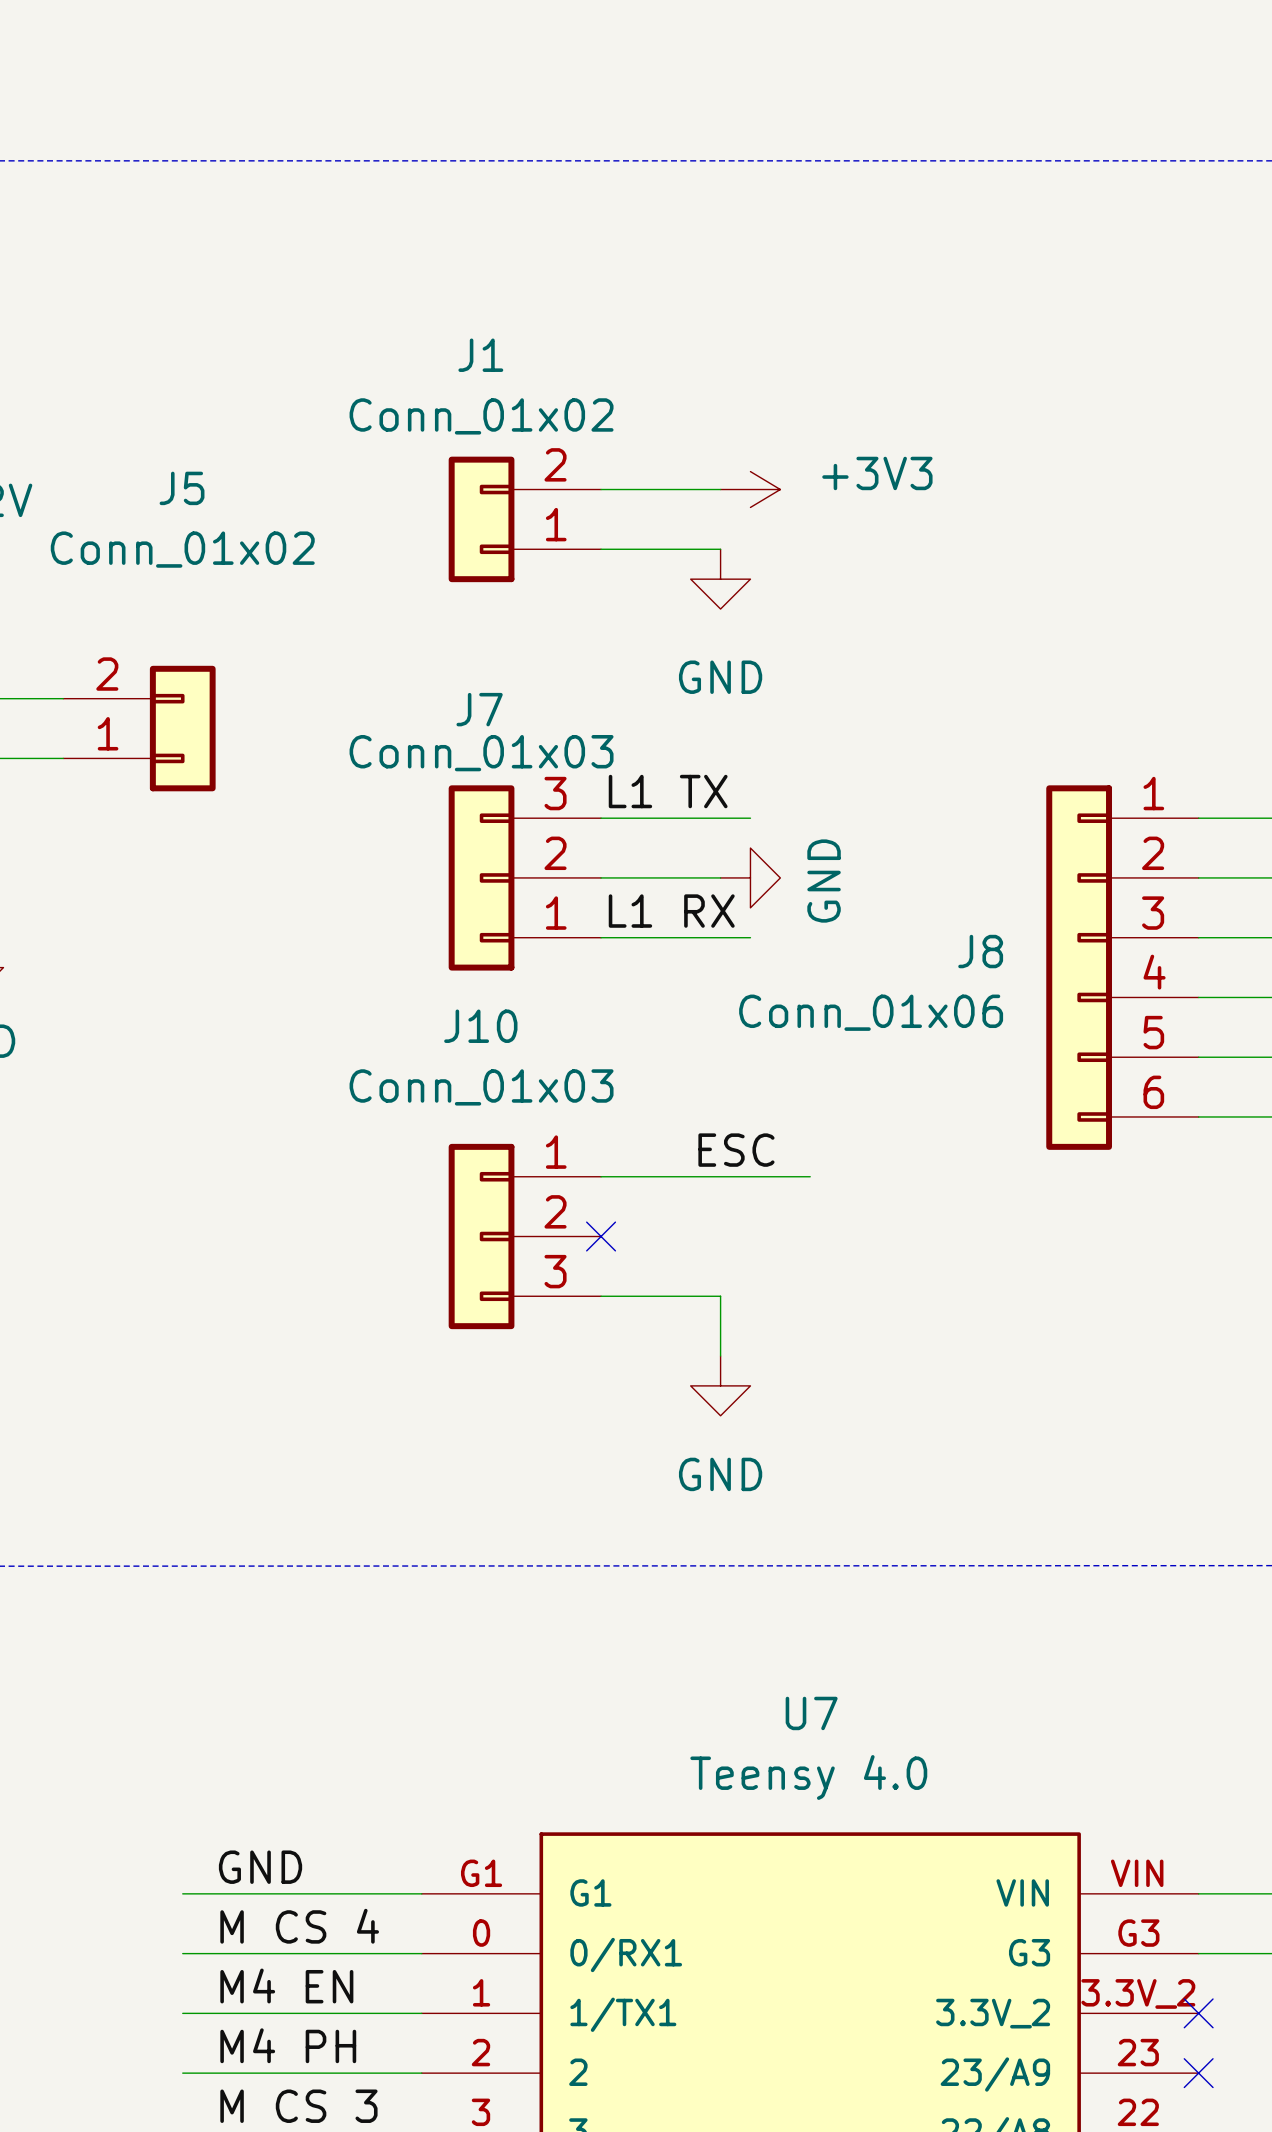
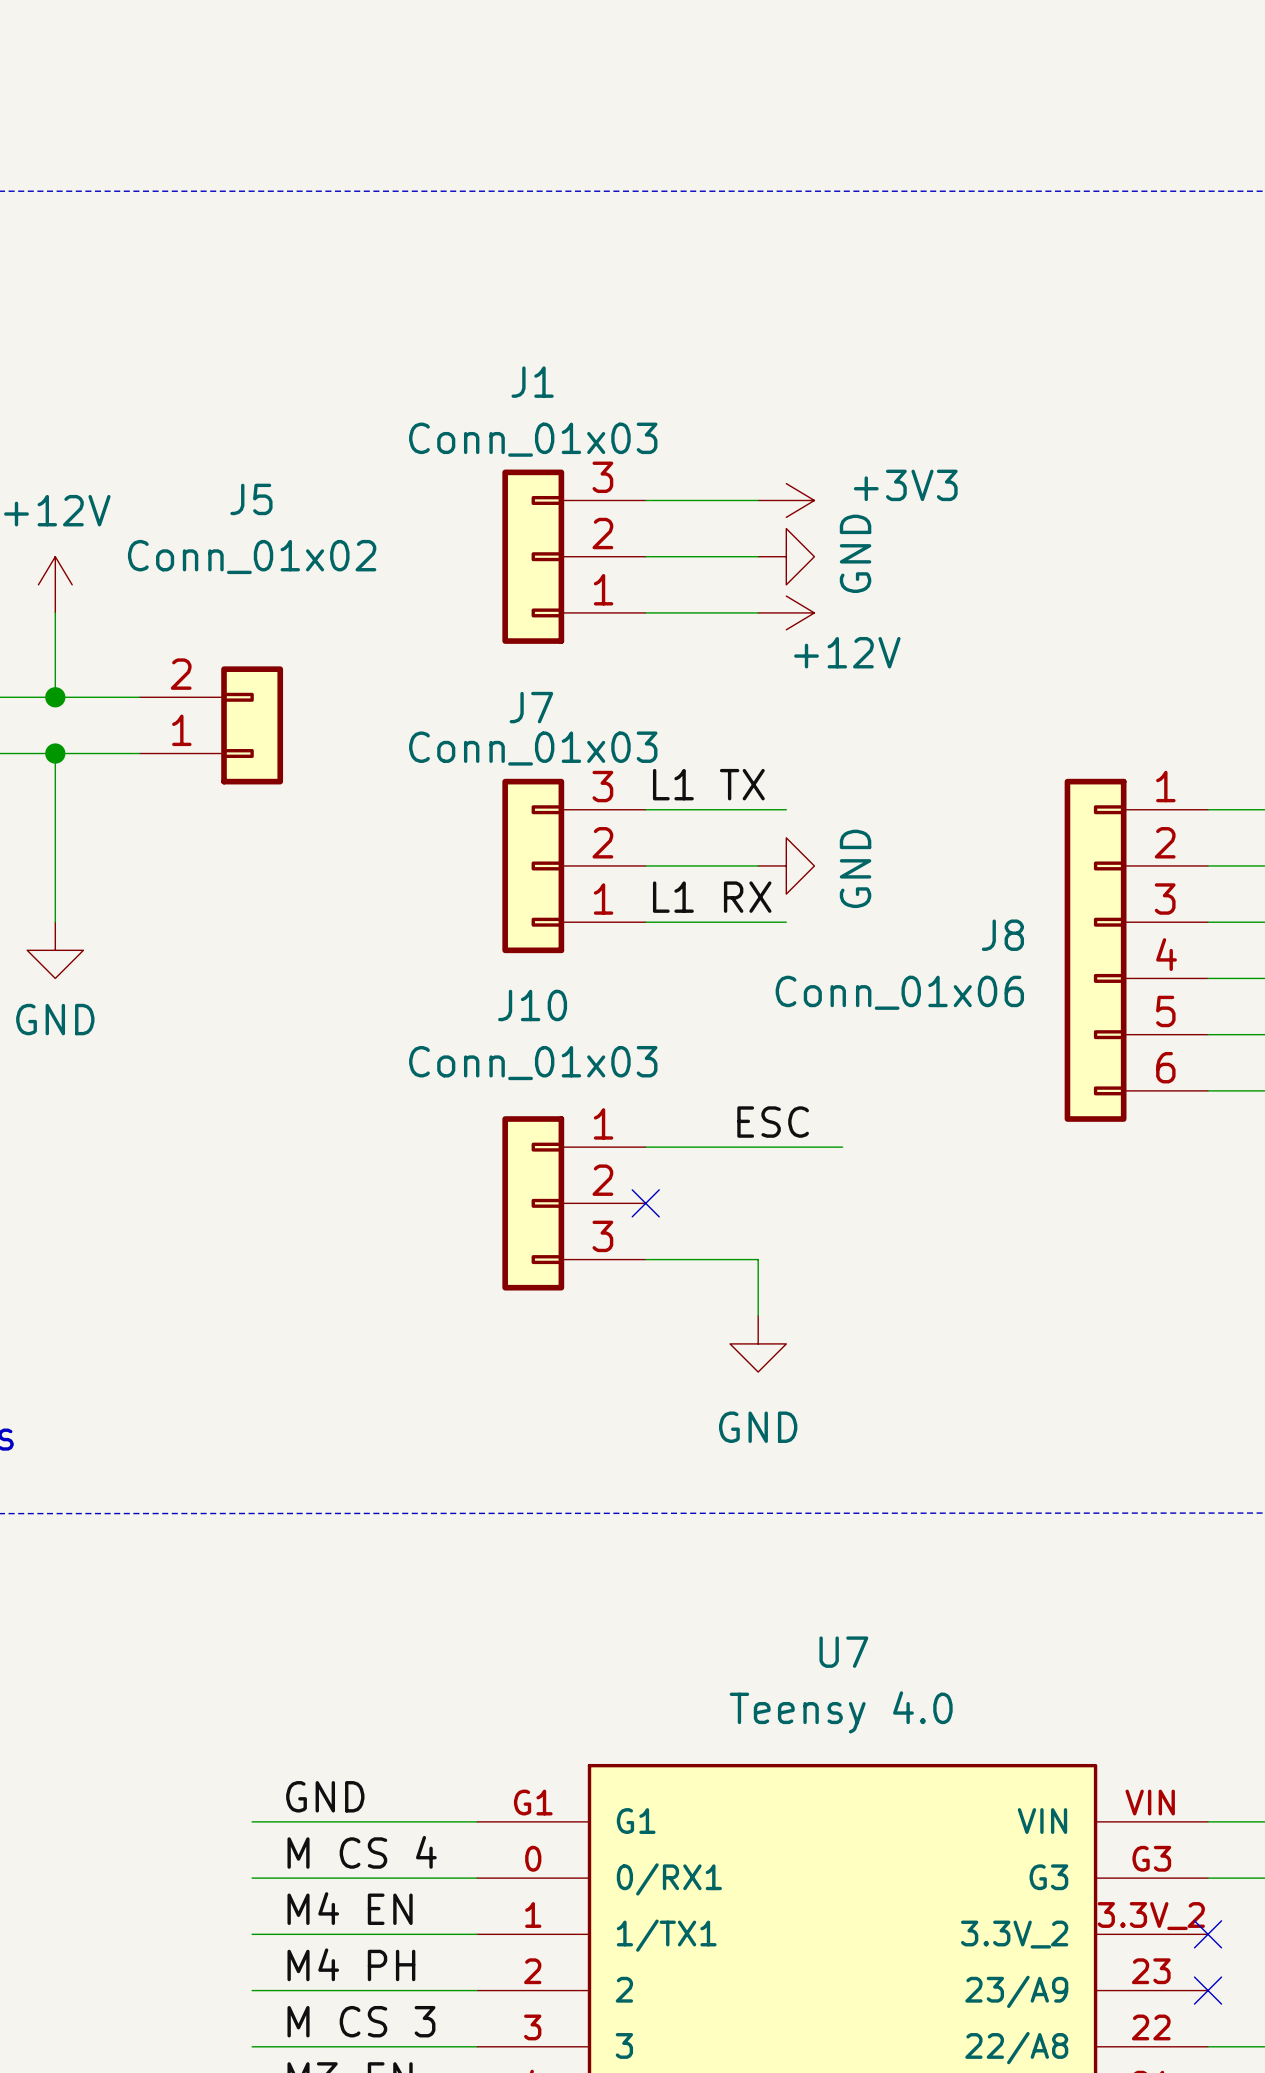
J1 value: Conn_01x02 (481, 416) -> Conn_01x03 (533, 439)
J1 symbol: [448, 456, 602, 583] -> [502, 469, 646, 644]
power symbol rotation: 0° (720, 579) -> 90° counterclockwise (786, 556)
power symbol position: GND (720, 579) -> GND (786, 556)
wire: none -> (645, 612) (758, 612)
power symbol: none -> +12V (786, 612)

